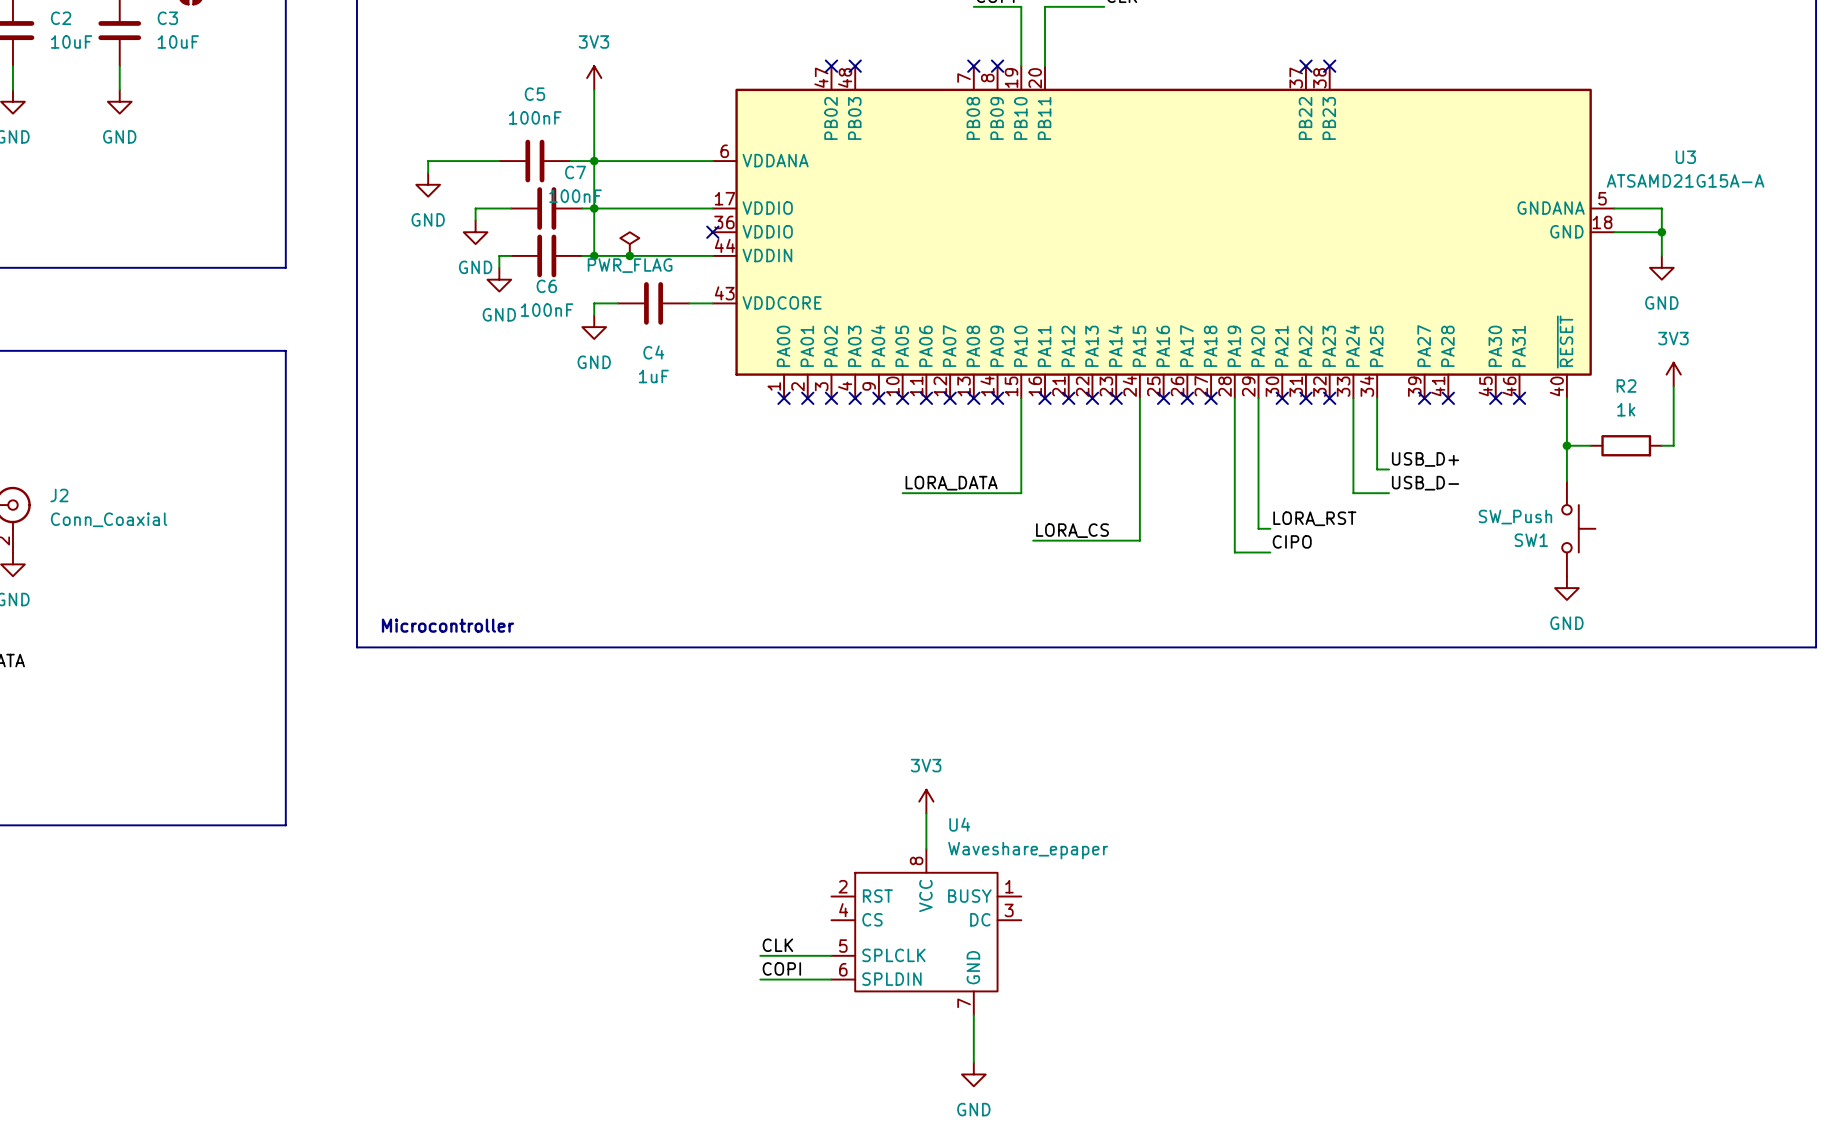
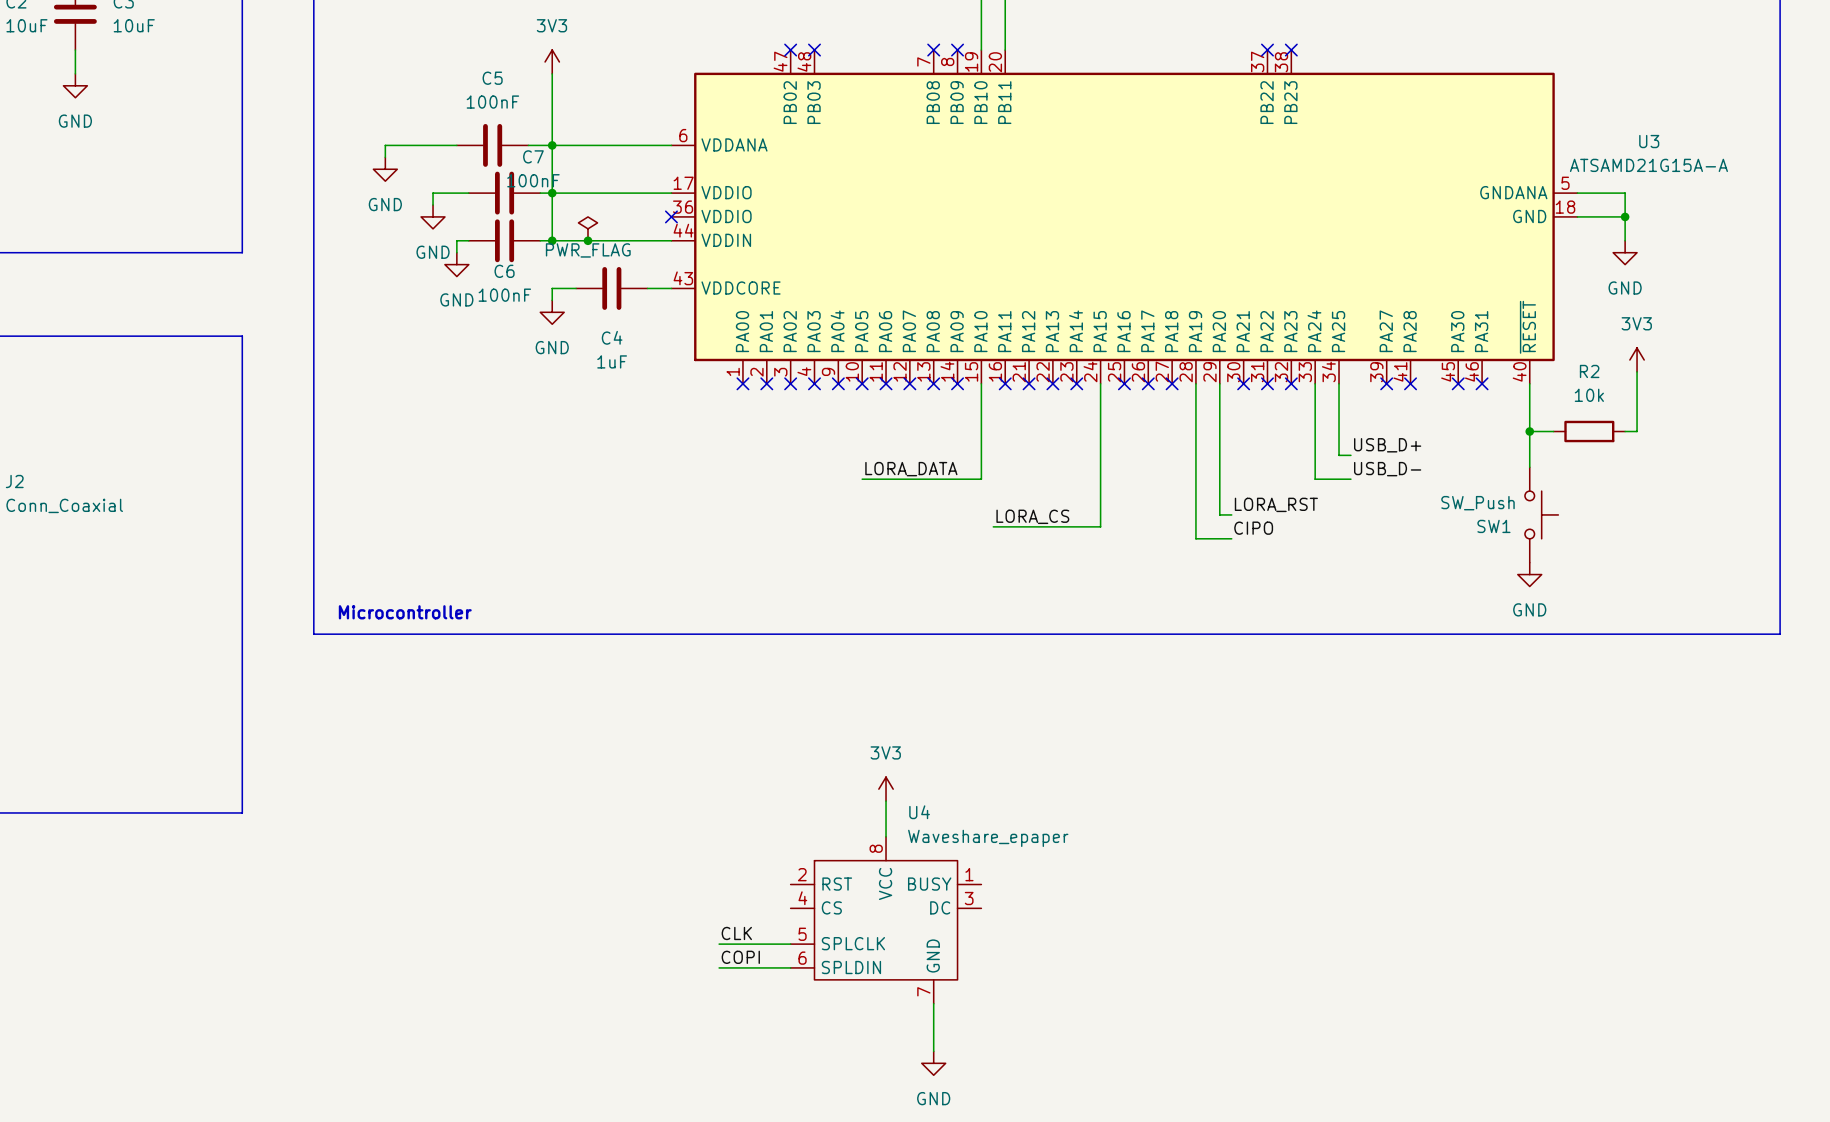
R2 value: 1k (1626, 409) -> 10k (1589, 395)

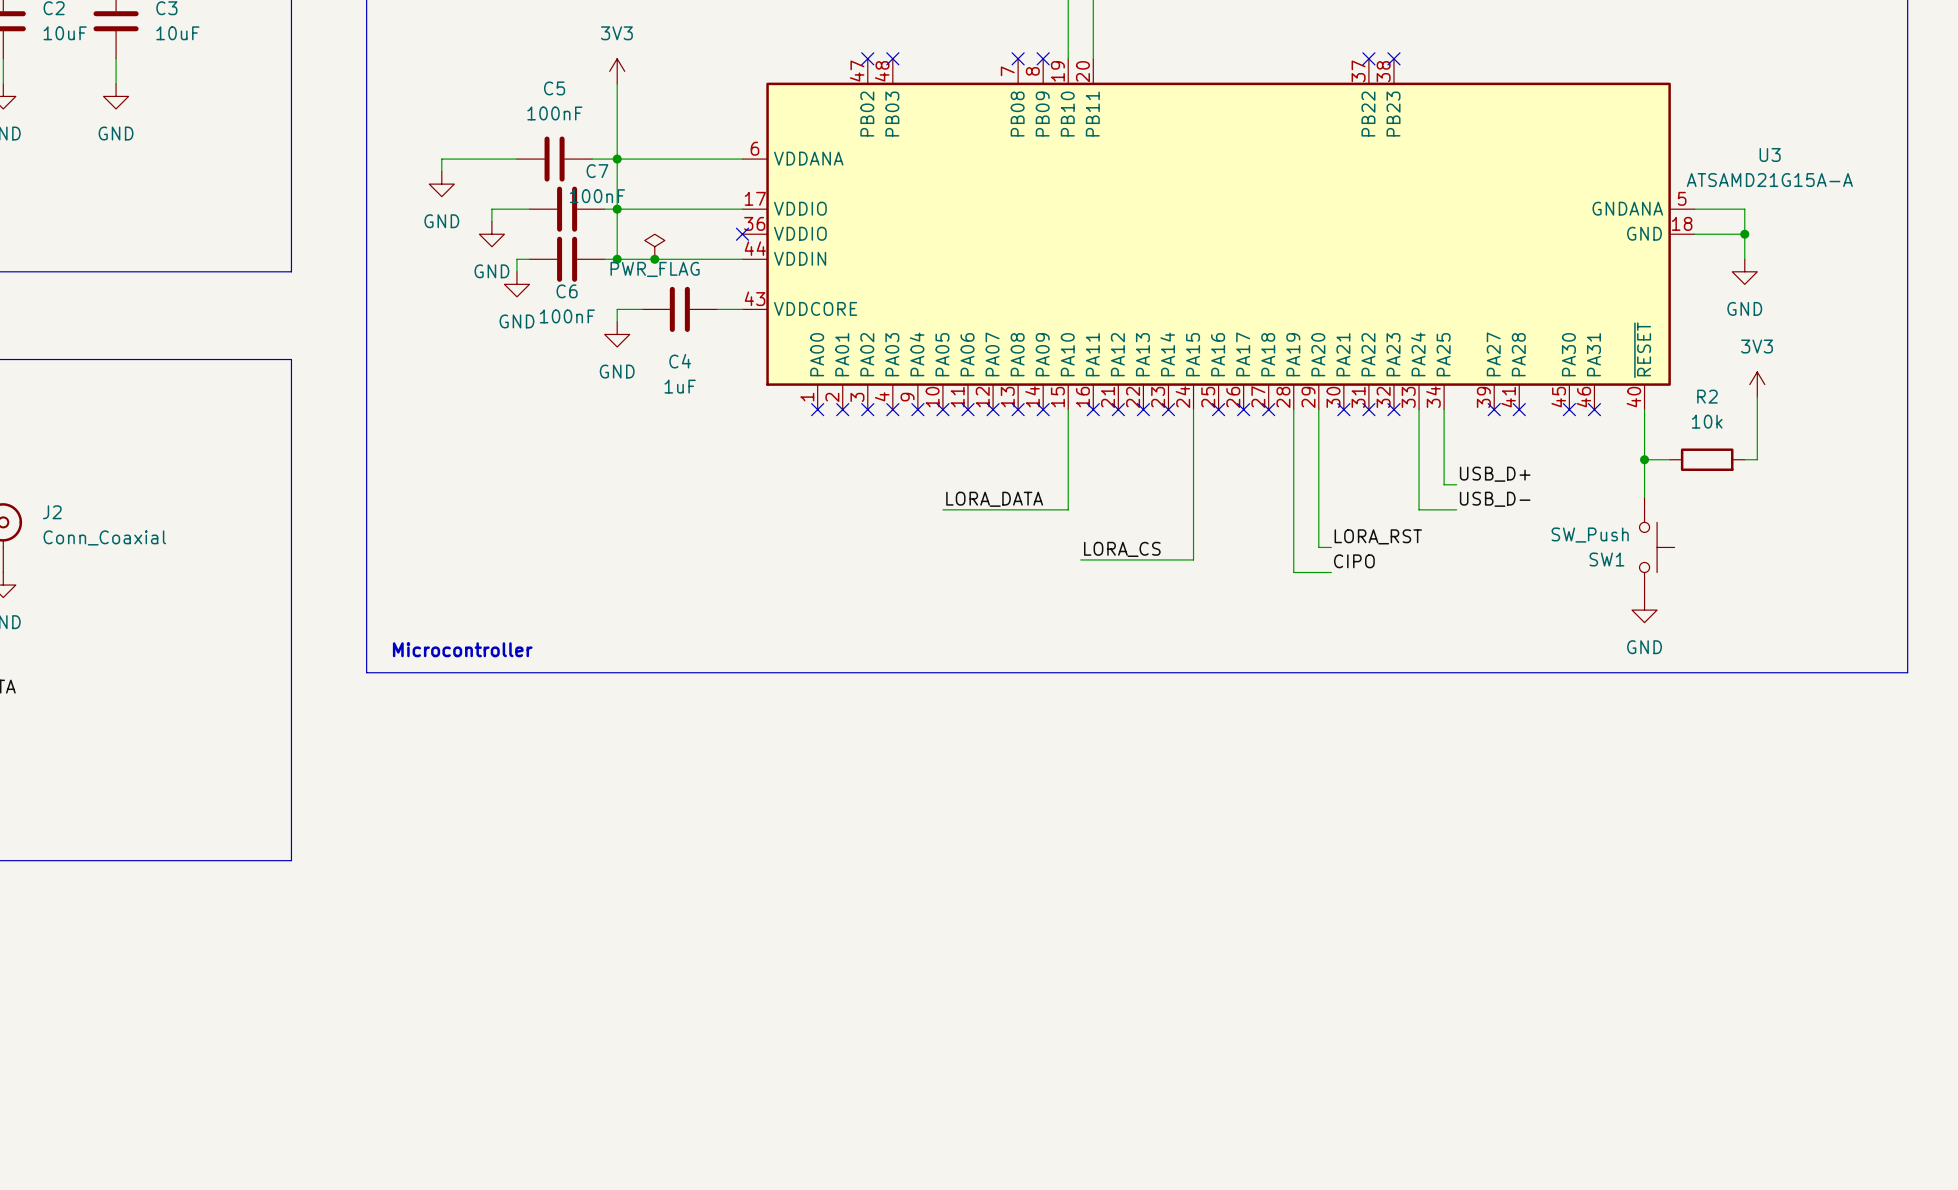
power symbol: 3V3 (886, 789) -> none
wire: (886, 801) (886, 836) -> none
U4: Waveshare_epaper (886, 920) -> none
label: CLK (736, 933) -> none
wire: (719, 944) (790, 944) -> none
label: COPI (740, 957) -> none
wire: (719, 967) (790, 967) -> none
wire: (933, 1003) (933, 1051) -> none
power symbol: GND (933, 1063) -> none

